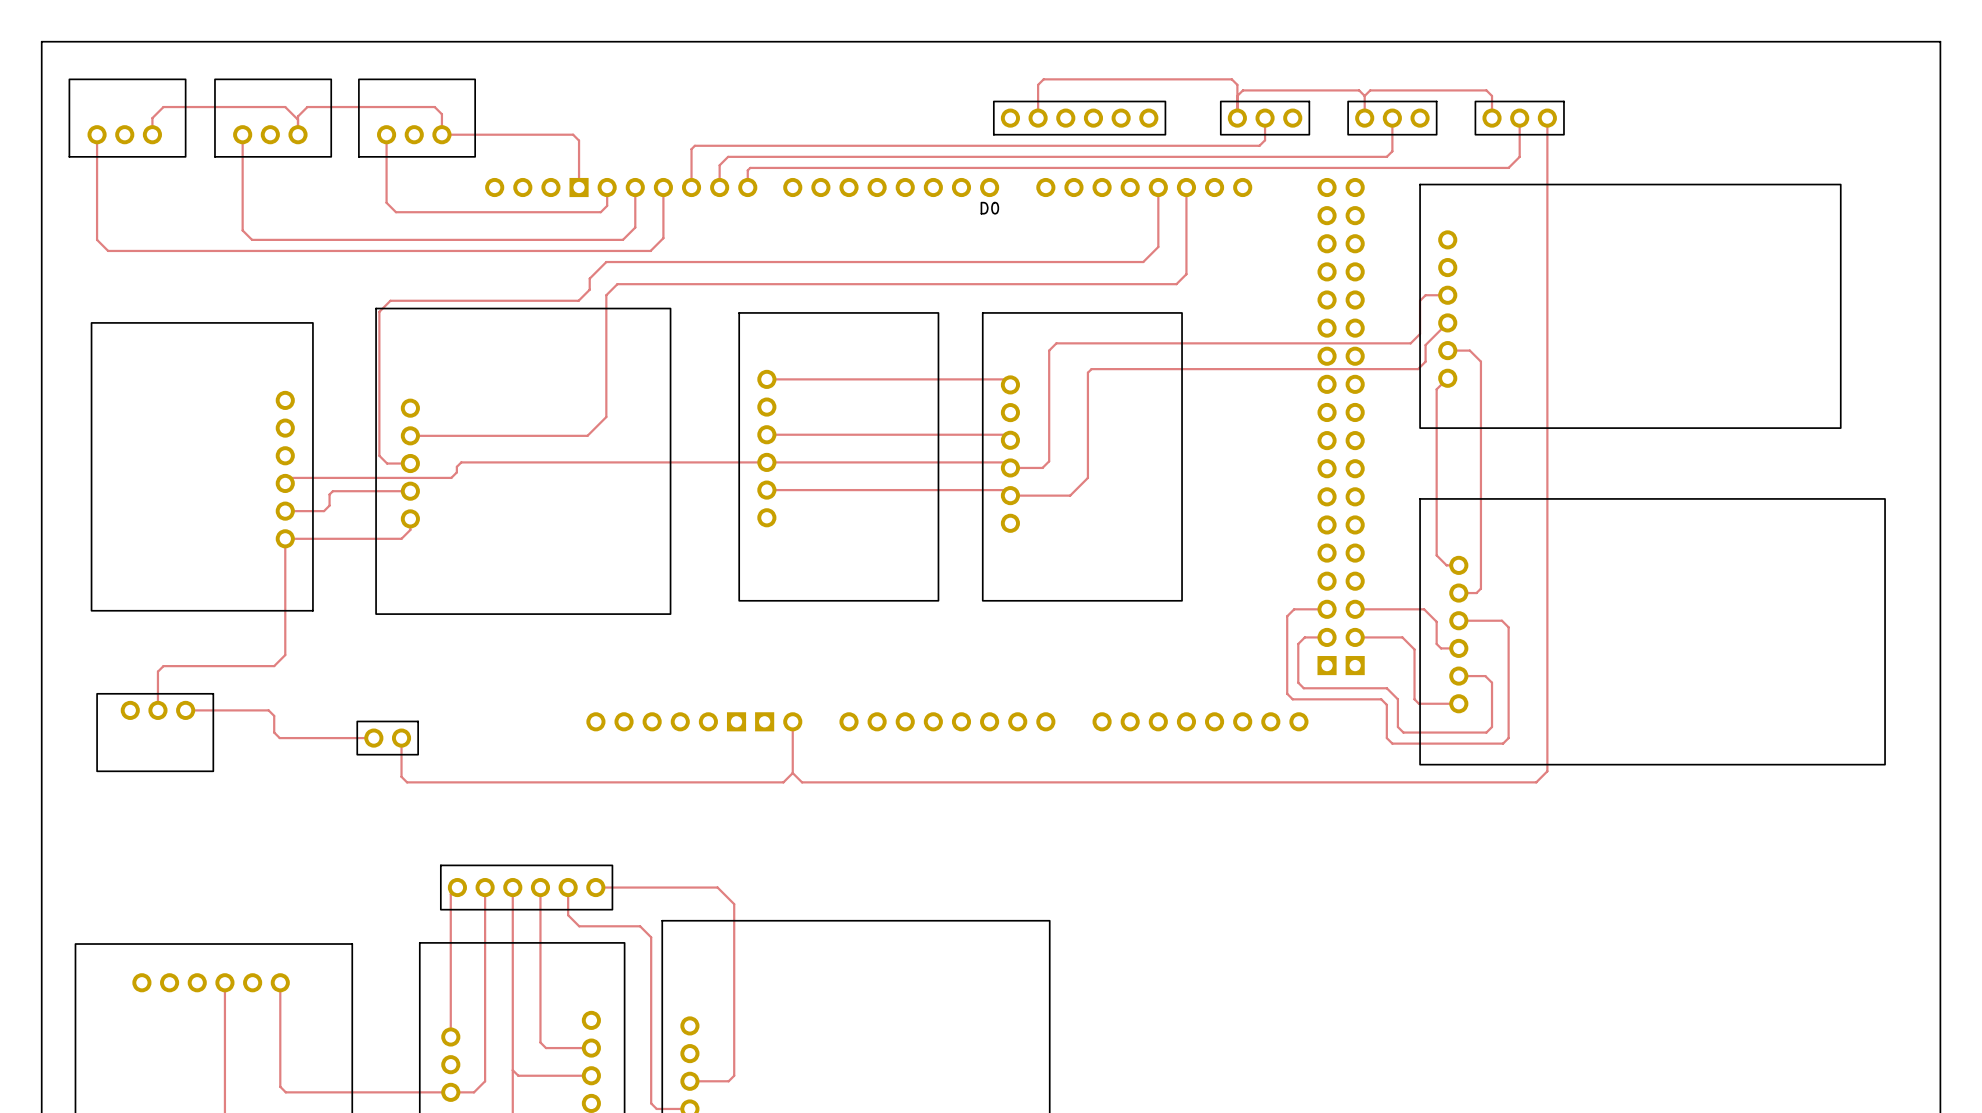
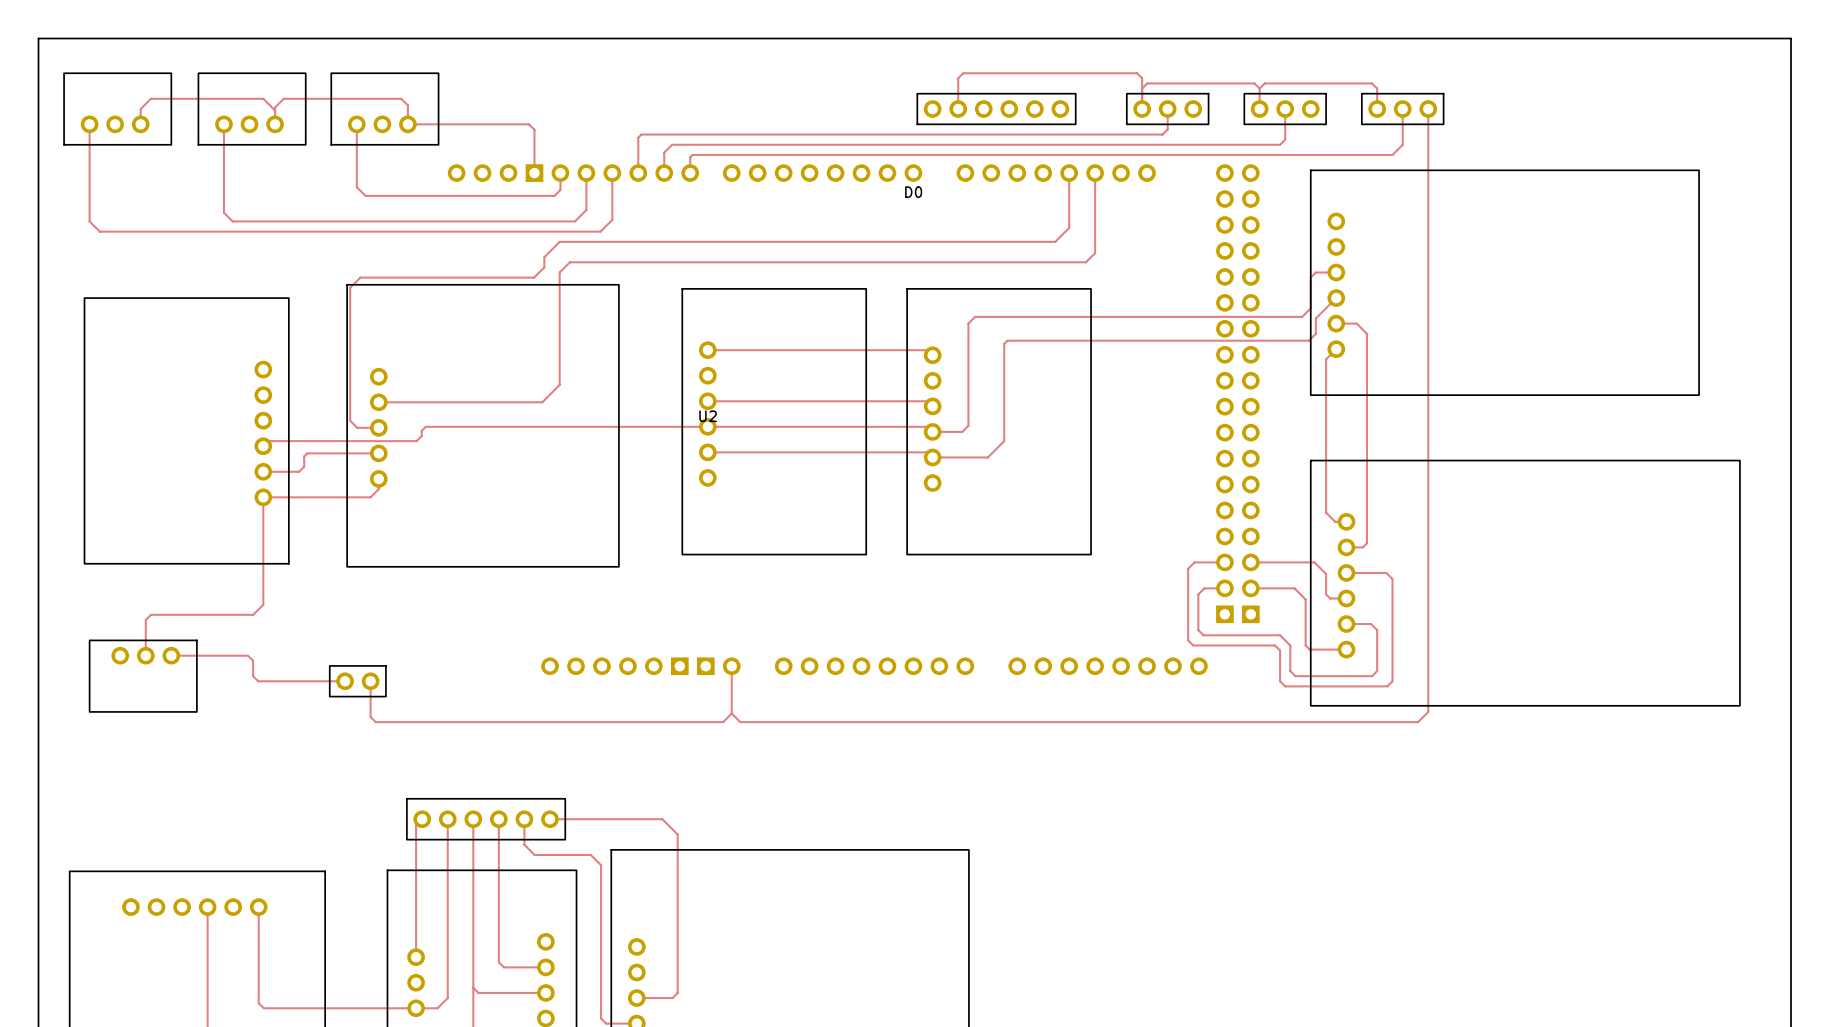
U2 name: none -> U2 (708, 416)

